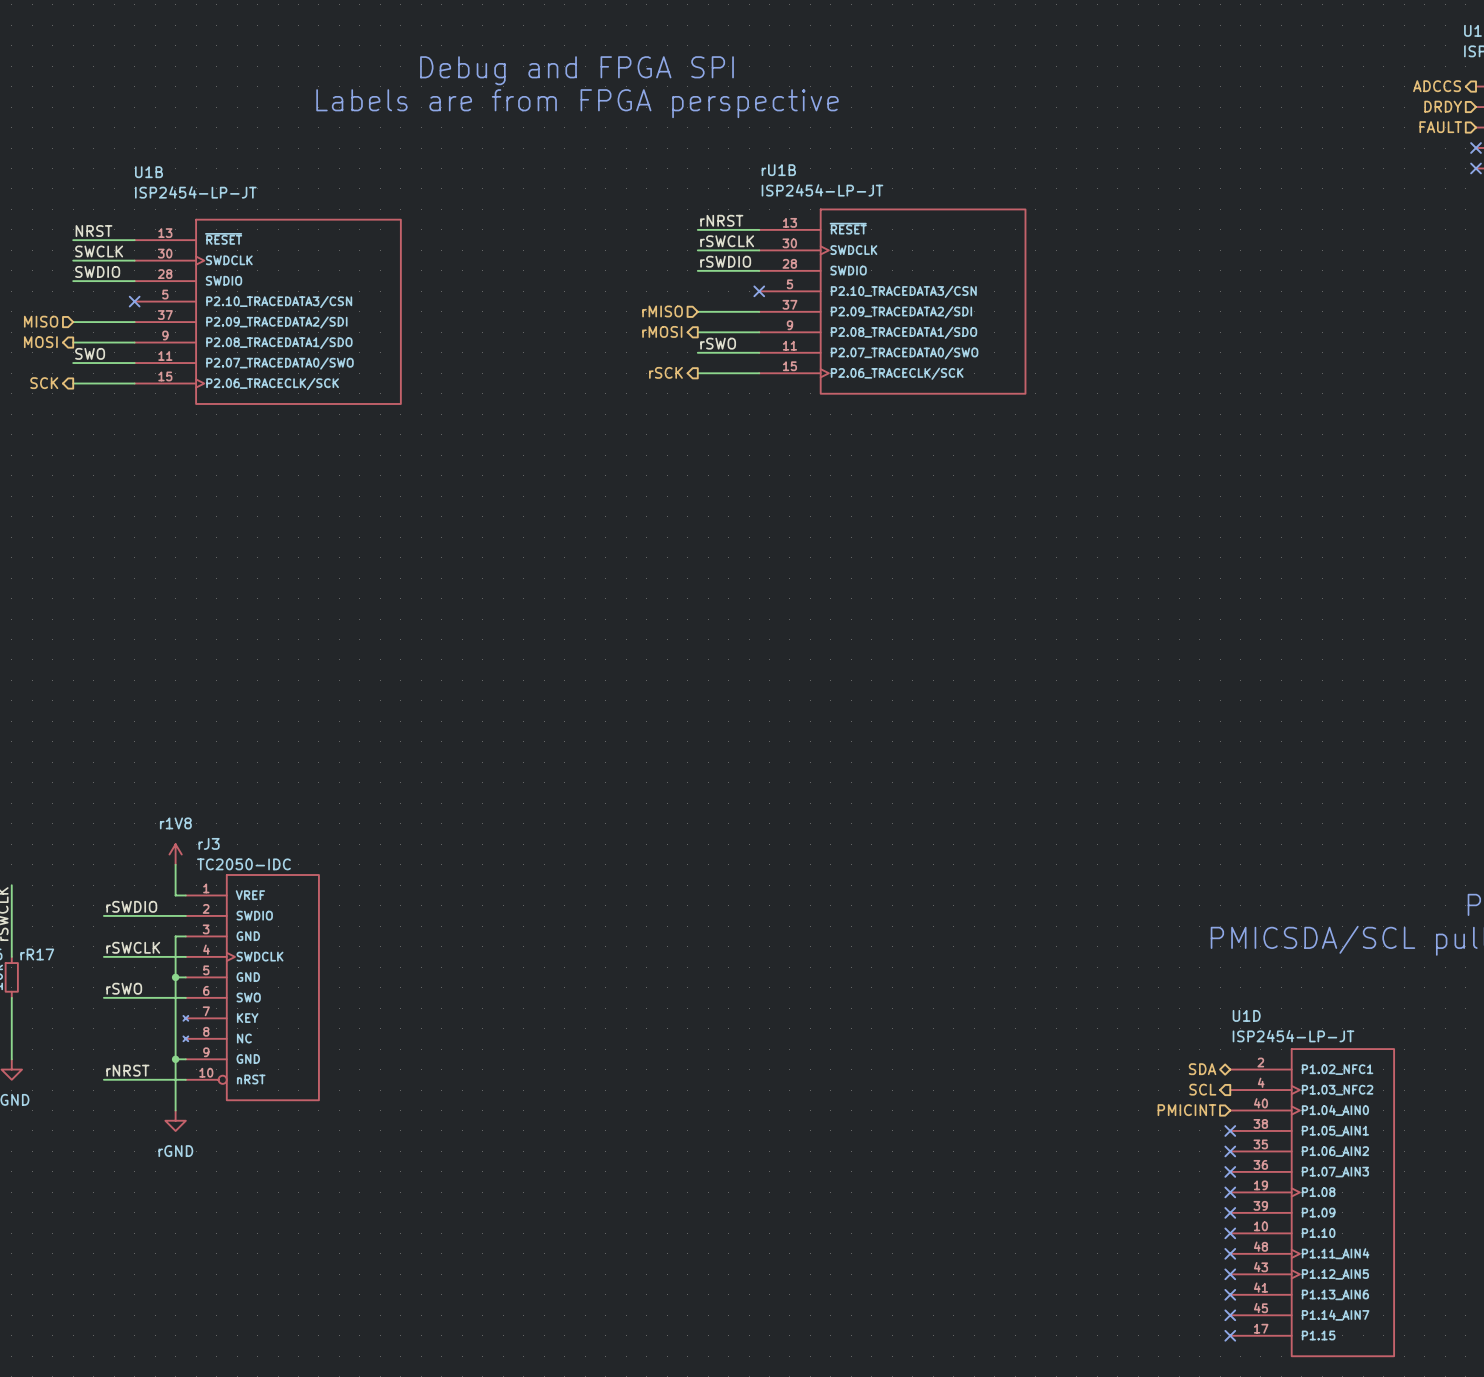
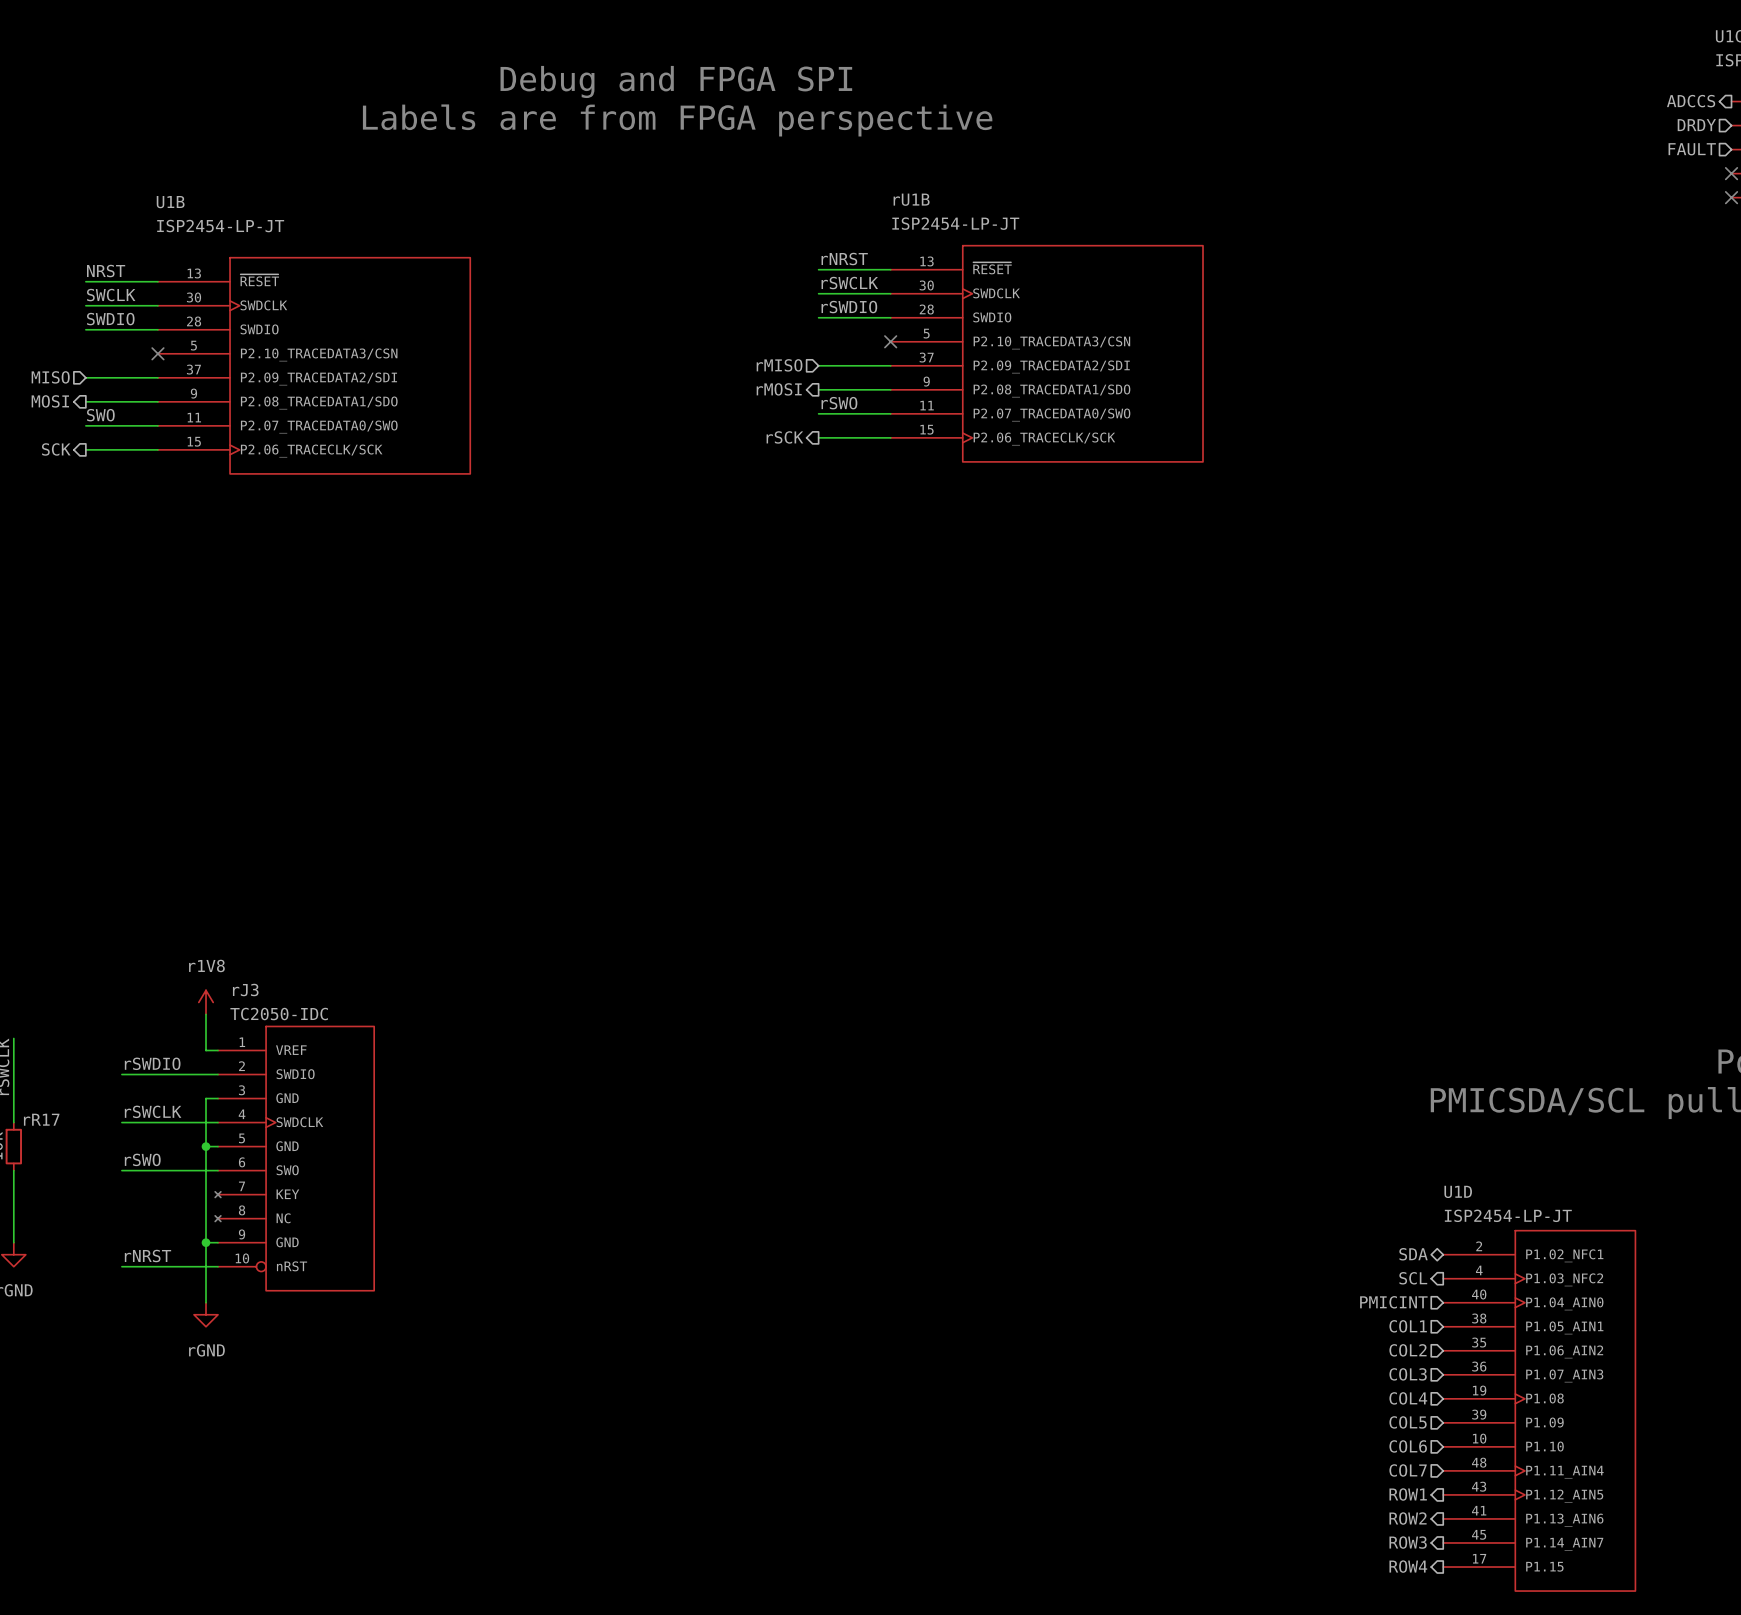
hierarchical label: none -> COL1 (1408, 1326)
no-connect mark: (1230, 1130) -> none
hierarchical label: none -> COL2 (1408, 1350)
no-connect mark: (1230, 1151) -> none
hierarchical label: none -> COL3 (1408, 1374)
no-connect mark: (1230, 1171) -> none
hierarchical label: none -> COL4 (1408, 1398)
no-connect mark: (1230, 1192) -> none
hierarchical label: none -> COL5 (1408, 1422)
no-connect mark: (1230, 1212) -> none
hierarchical label: none -> COL6 (1408, 1446)
no-connect mark: (1230, 1233) -> none
hierarchical label: none -> COL7 (1408, 1470)
no-connect mark: (1230, 1253) -> none
hierarchical label: none -> ROW1 (1408, 1494)
no-connect mark: (1230, 1274) -> none
hierarchical label: none -> ROW2 (1408, 1518)
no-connect mark: (1230, 1294) -> none
hierarchical label: none -> ROW3 (1408, 1542)
no-connect mark: (1230, 1315) -> none
hierarchical label: none -> ROW4 (1408, 1566)
no-connect mark: (1230, 1335) -> none

